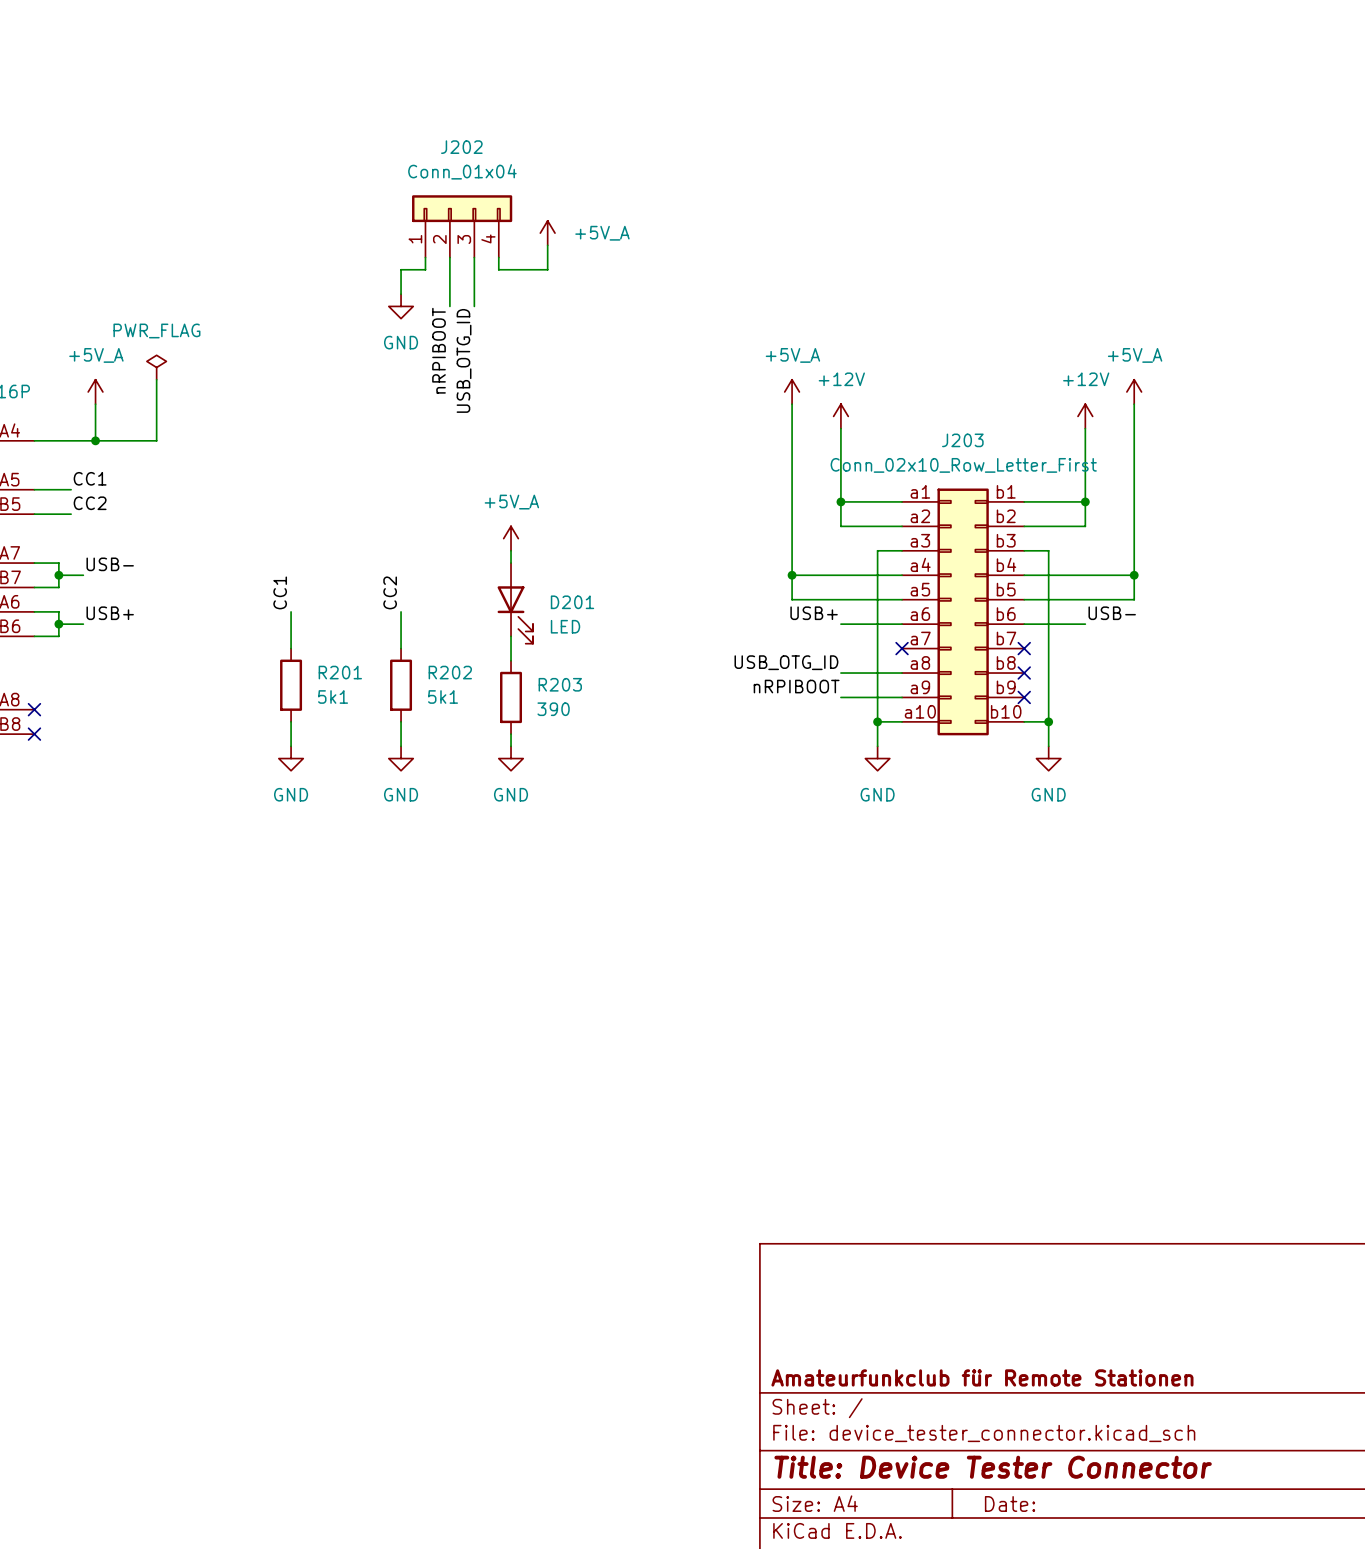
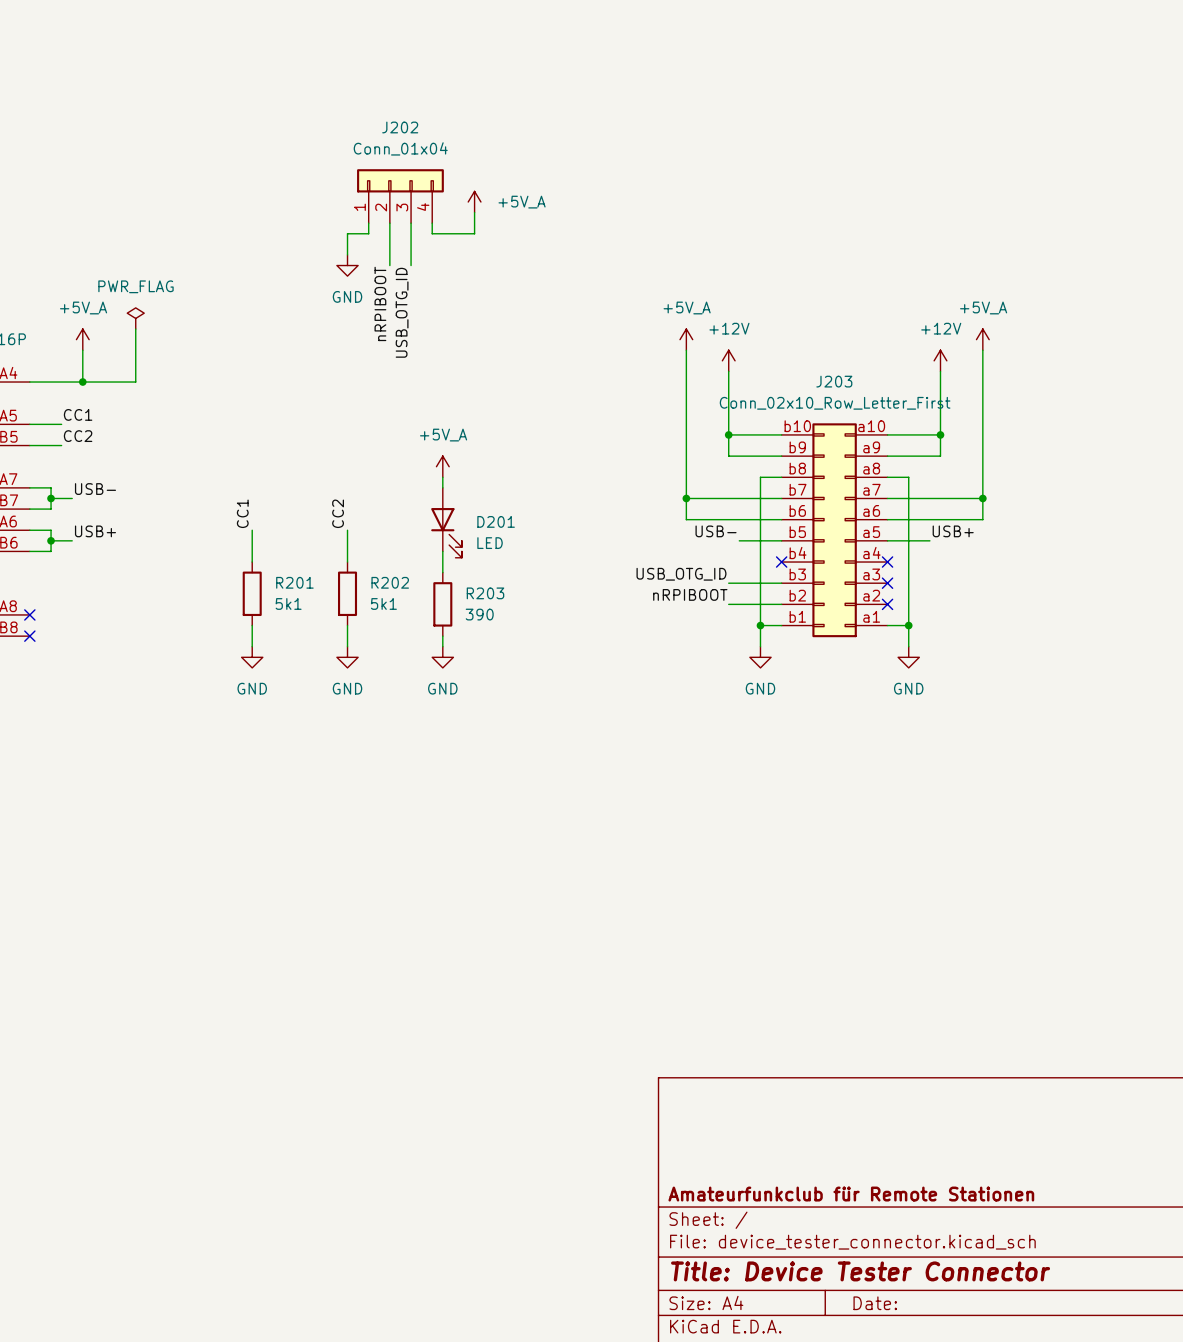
J203 rotation: 0° (963, 611) -> 180° (834, 530)
label position: USB+ (814, 613) -> USB+ (953, 531)
label position: USB- (1112, 613) -> USB- (716, 531)
wire: (840, 624) (853, 624) -> none
wire: (1073, 624) (1085, 624) -> none

